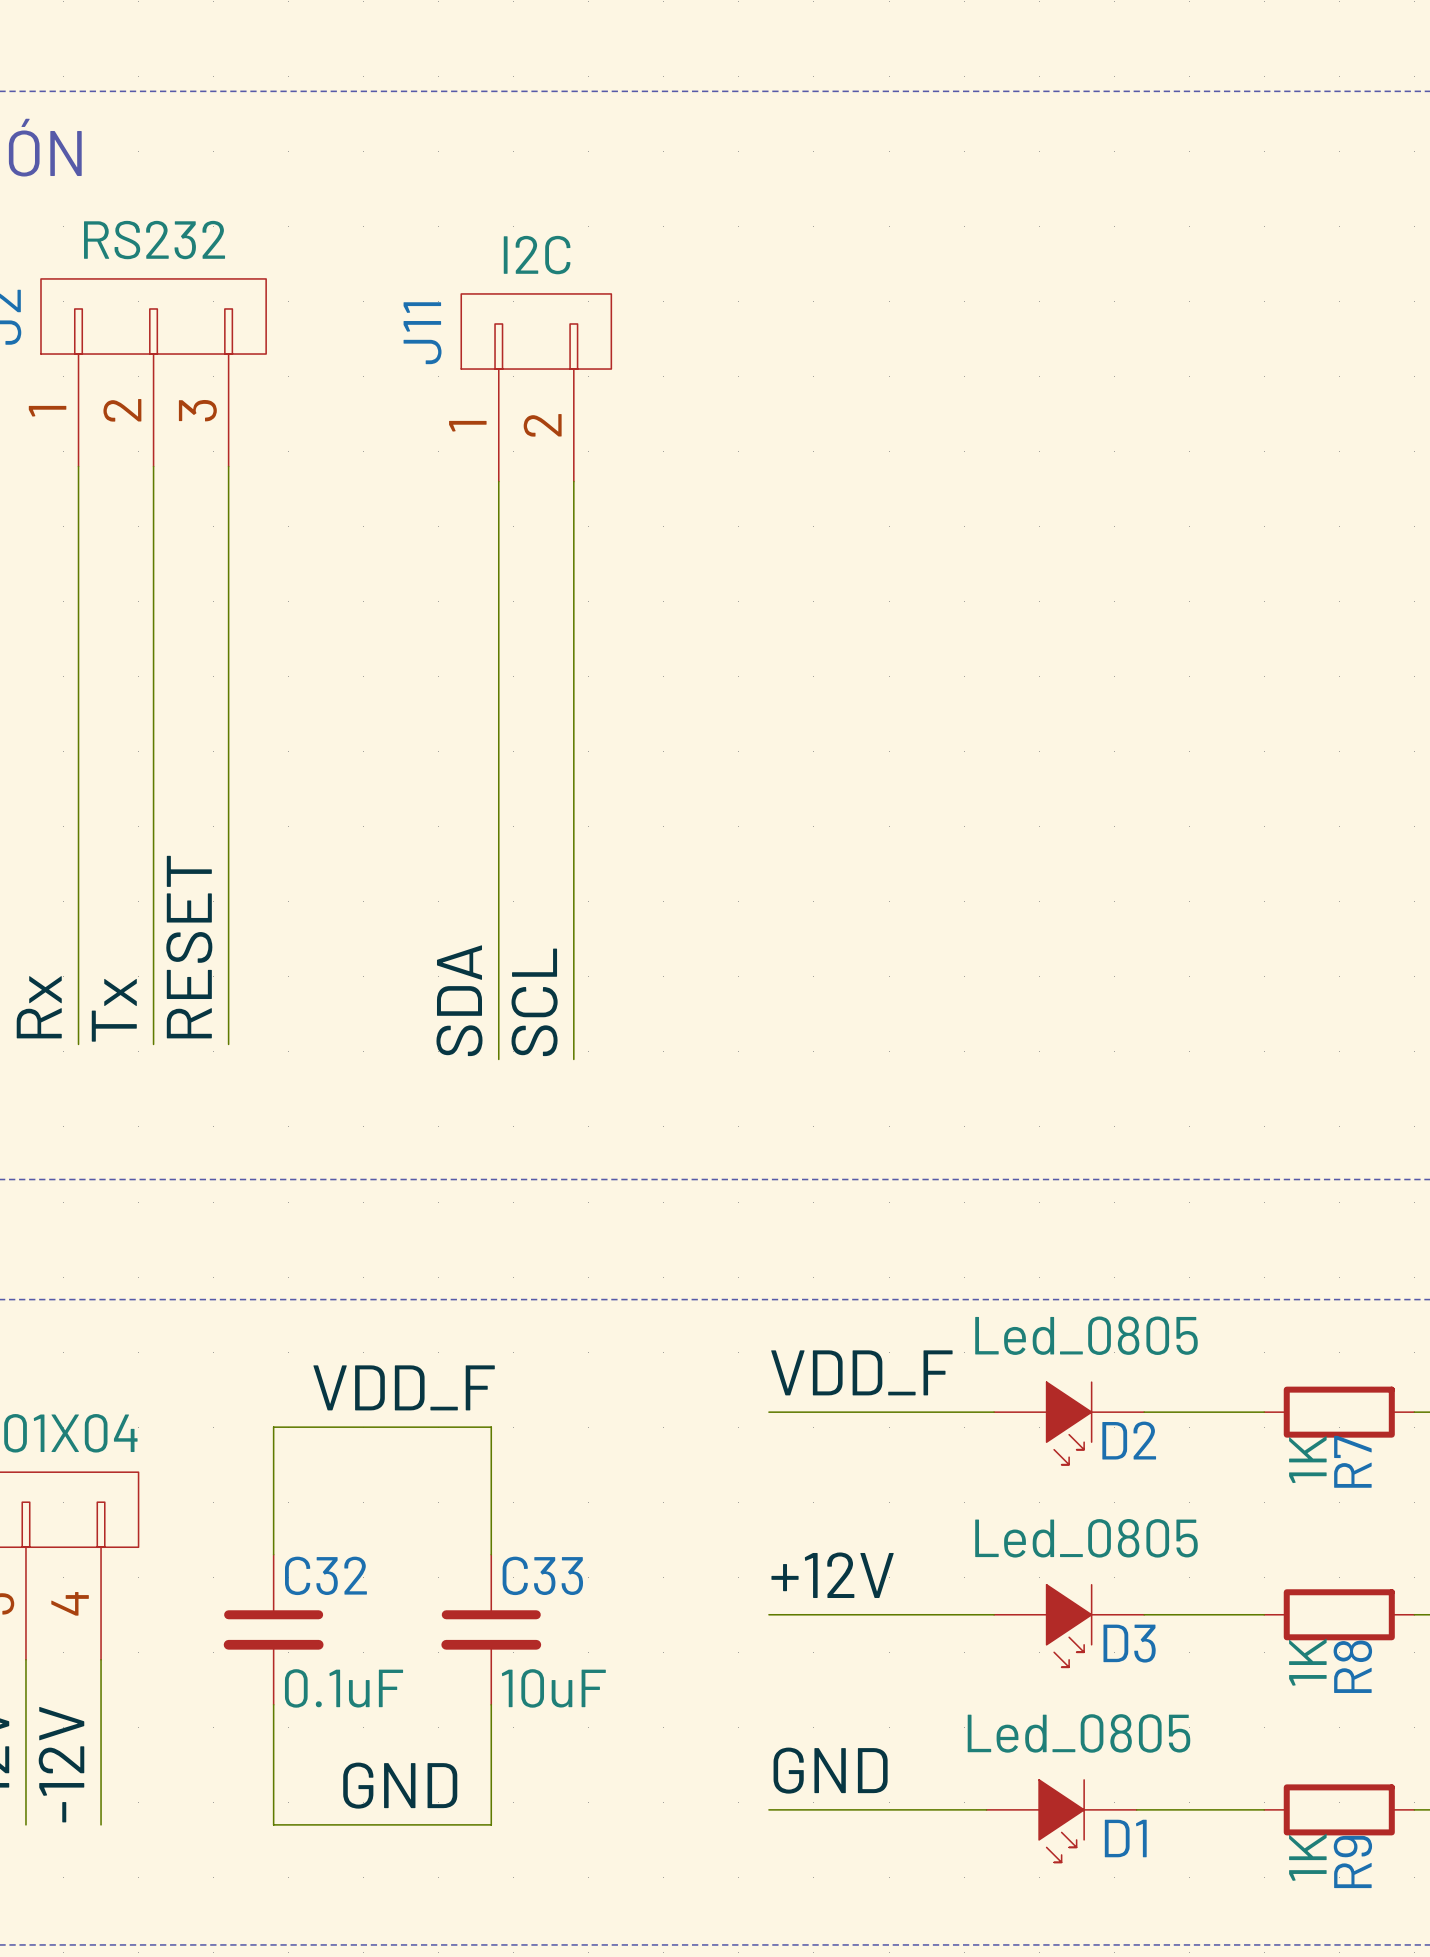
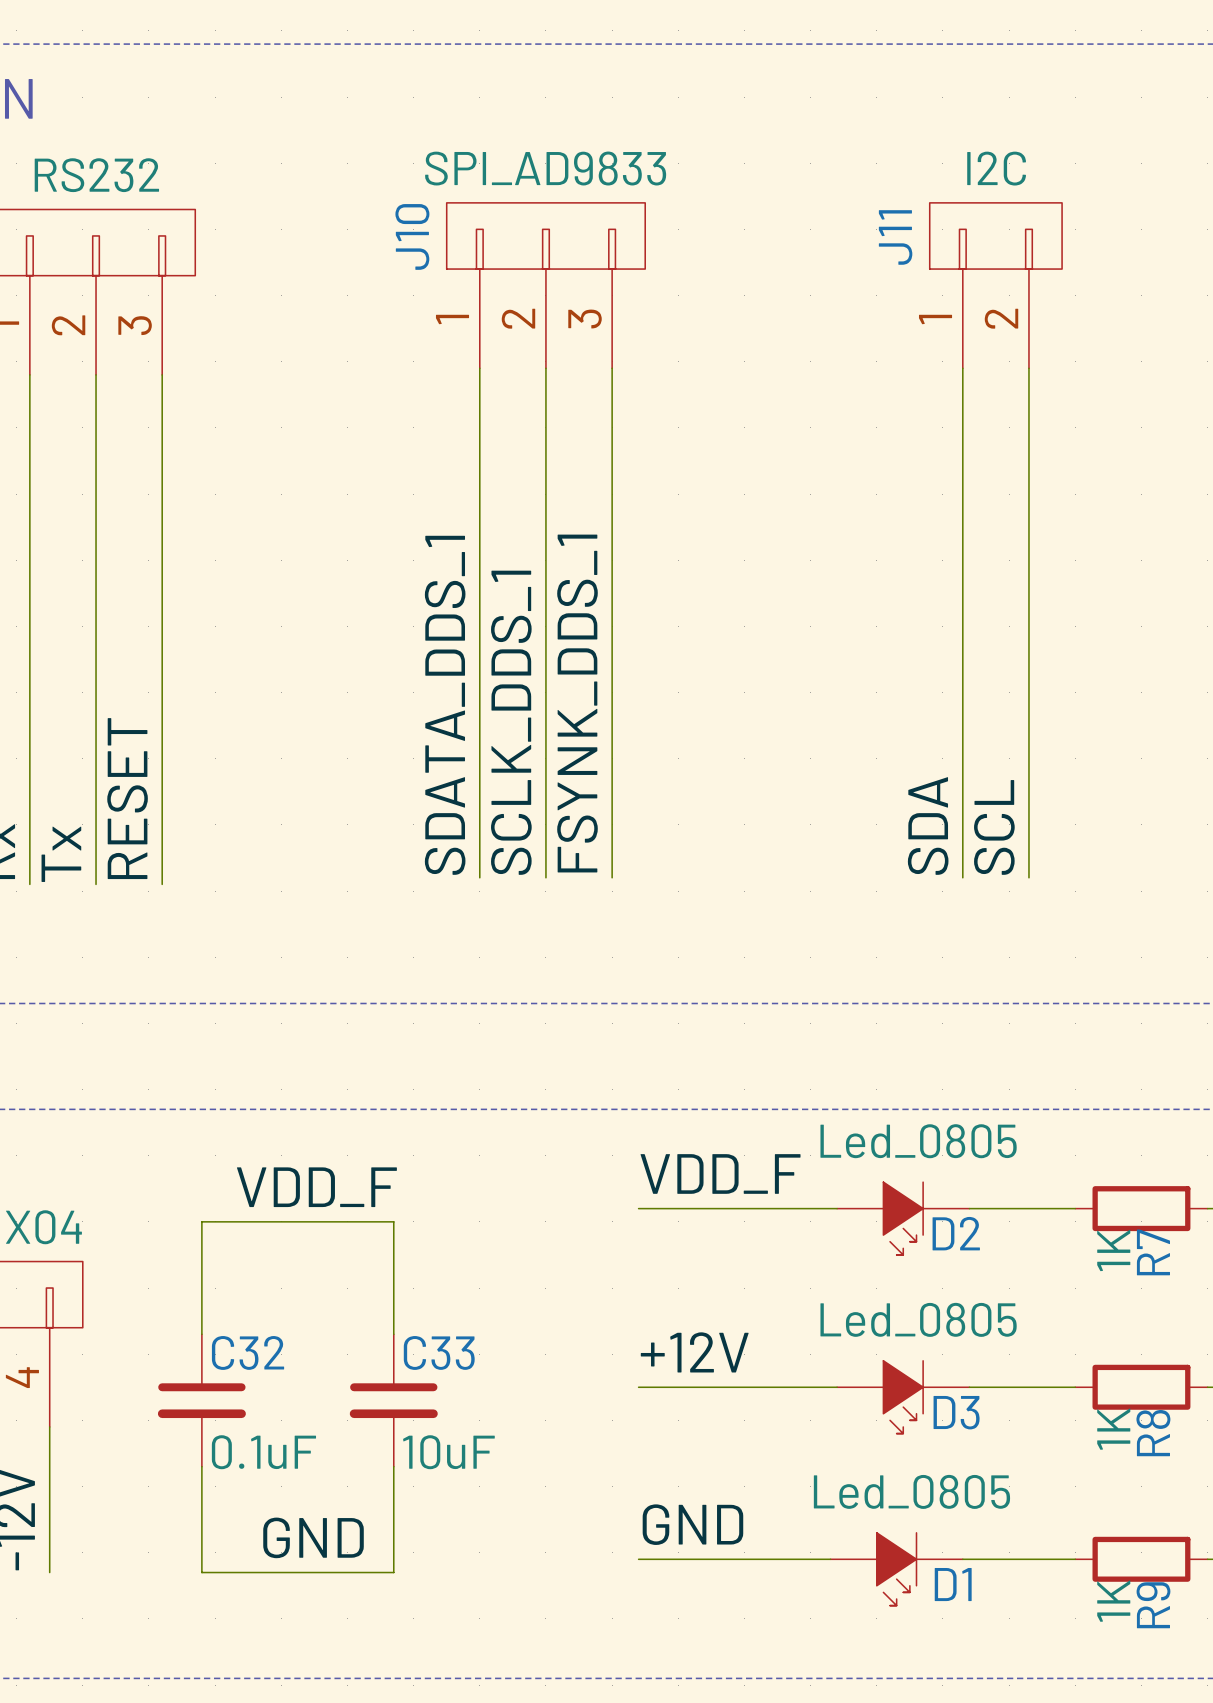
J10: none -> SPI_AD9833 (545, 285)
J11 position: (536, 387) -> (995, 285)
wire: none -> (612, 368) (612, 877)
wire: none -> (962, 368) (962, 877)
wire: none -> (1028, 368) (1028, 877)
wire: (498, 481) (498, 1059) -> (479, 368) (479, 877)
wire: (573, 481) (573, 1059) -> (545, 368) (545, 877)
label: none -> FSYNK_DDS_1 (577, 703)
label: none -> SDATA_DDS_1 (445, 705)
label: none -> SCLK_DDS_1 (511, 722)
label position: SDA (459, 1000) -> SDA (928, 826)
label position: SCL (534, 1002) -> SCL (994, 827)

